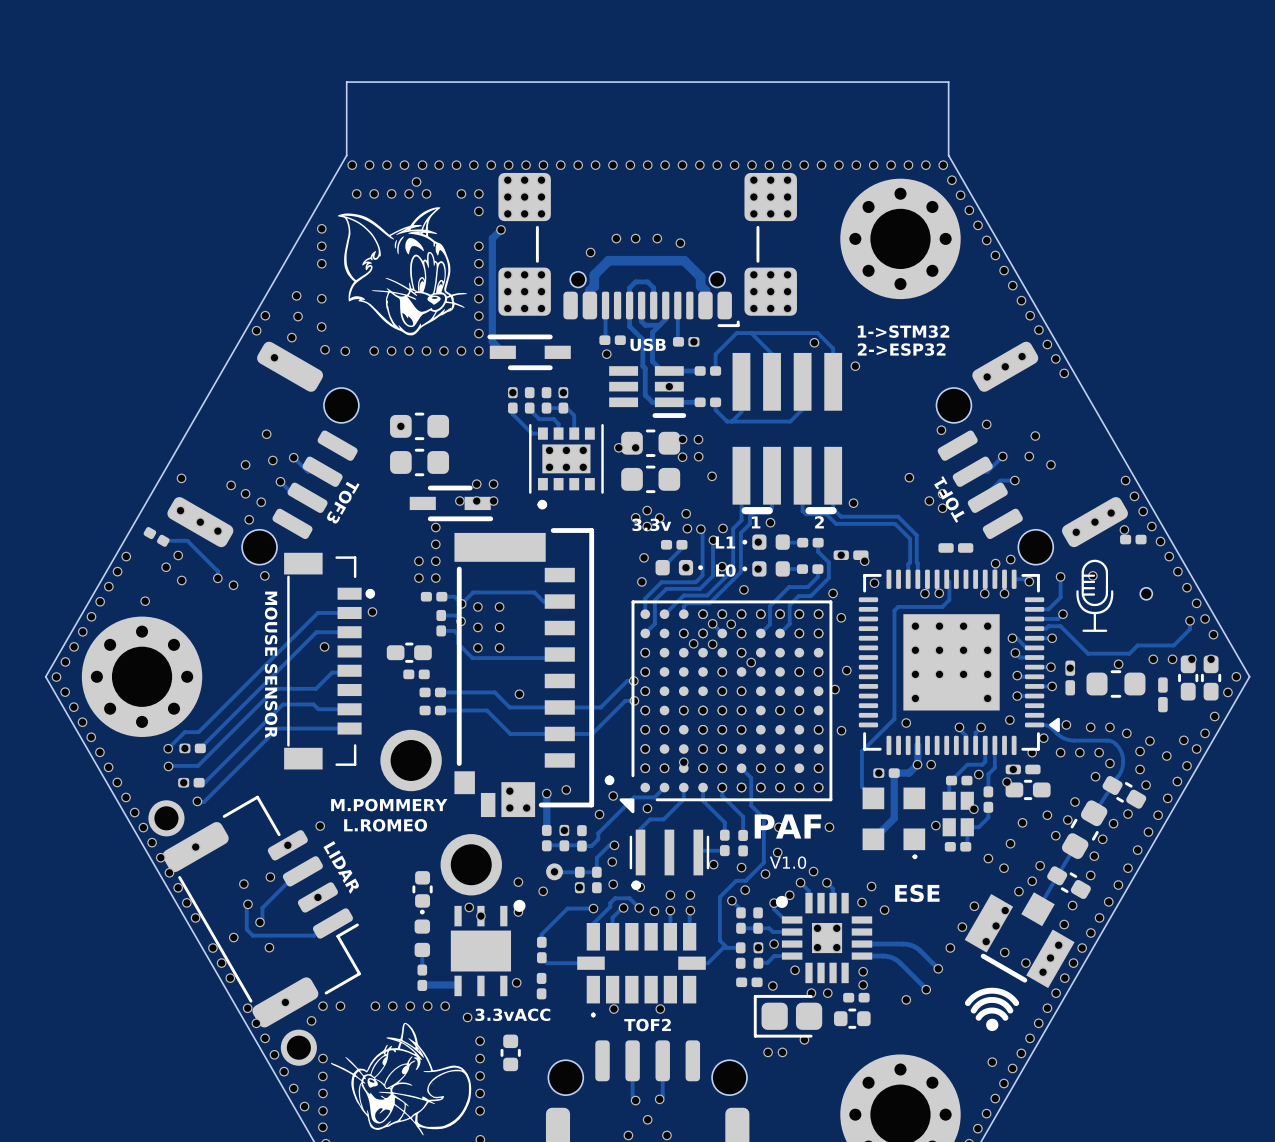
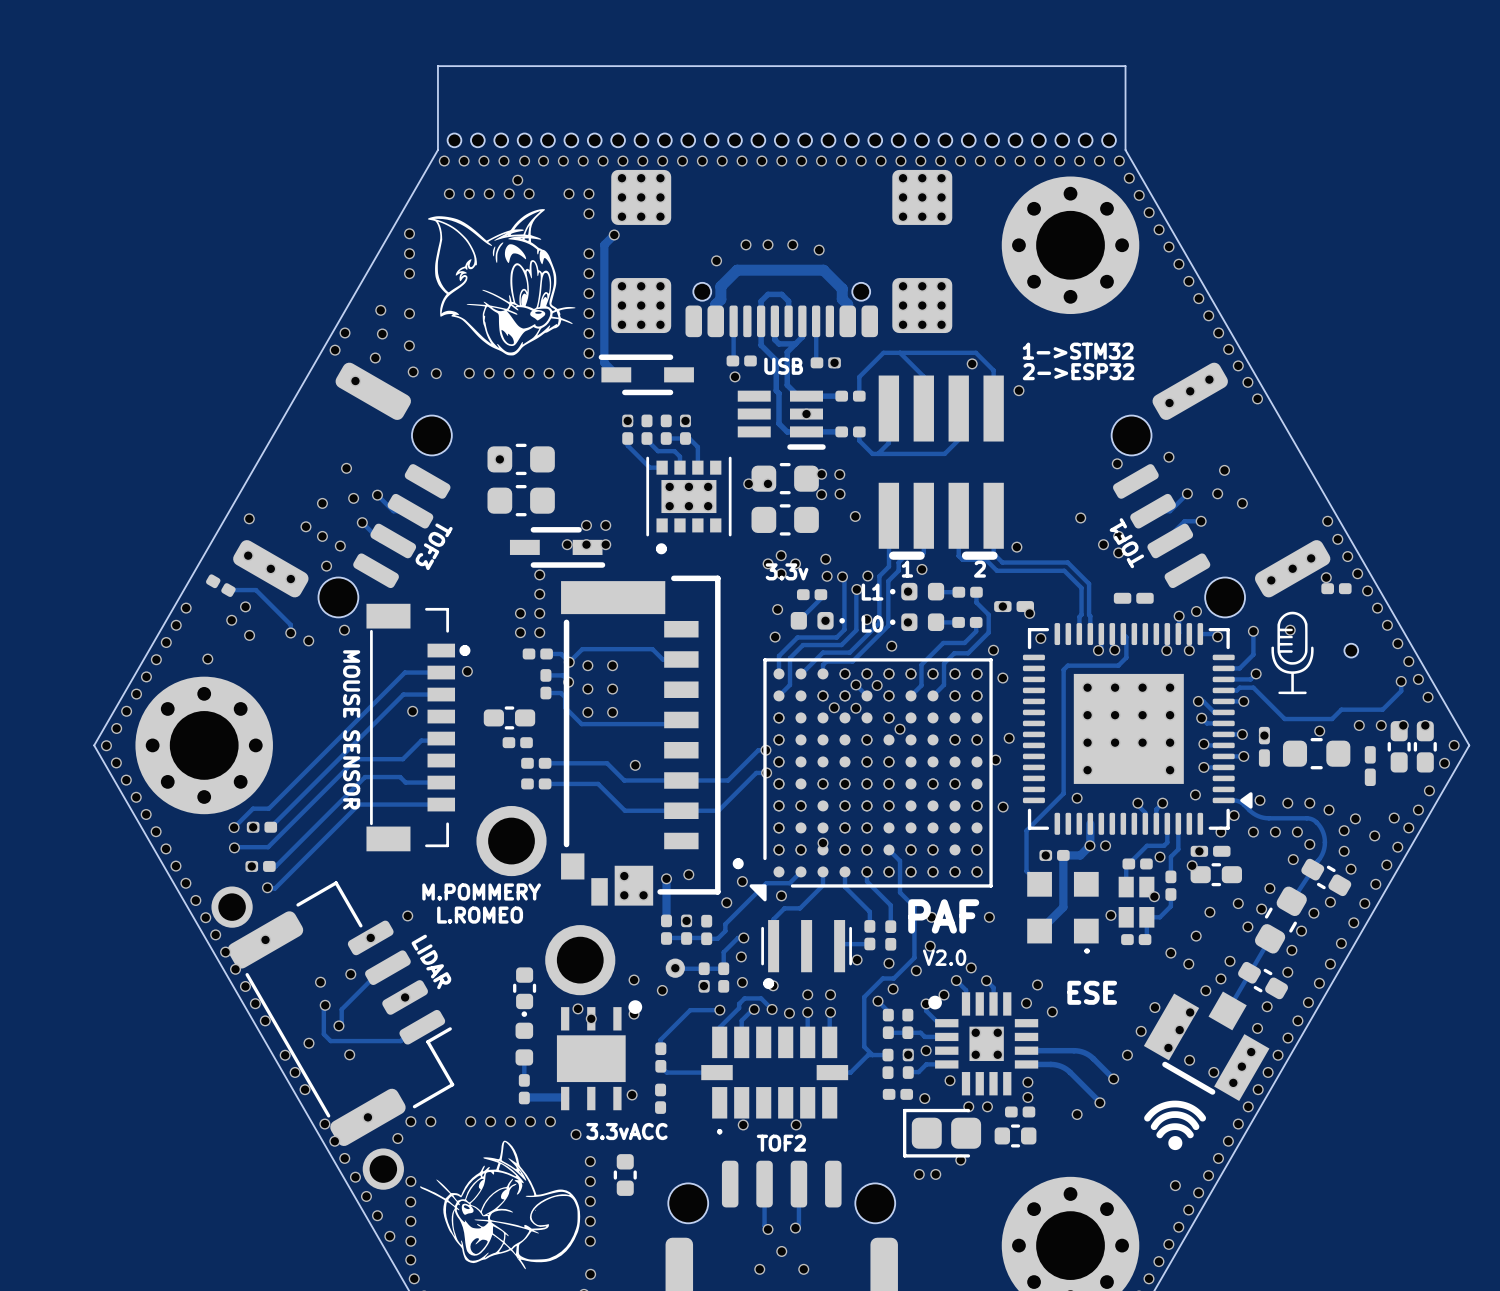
part: none -> (501, 140)
part: none -> (618, 140)
part: none -> (734, 140)
part: none -> (851, 140)
part: none -> (968, 140)
part: none -> (1050, 140)
part: none -> (1097, 140)
part footprint: [498, 172, 797, 328] -> [611, 169, 953, 338]
text: V1.0 (788, 862) -> V2.0 (944, 957)

